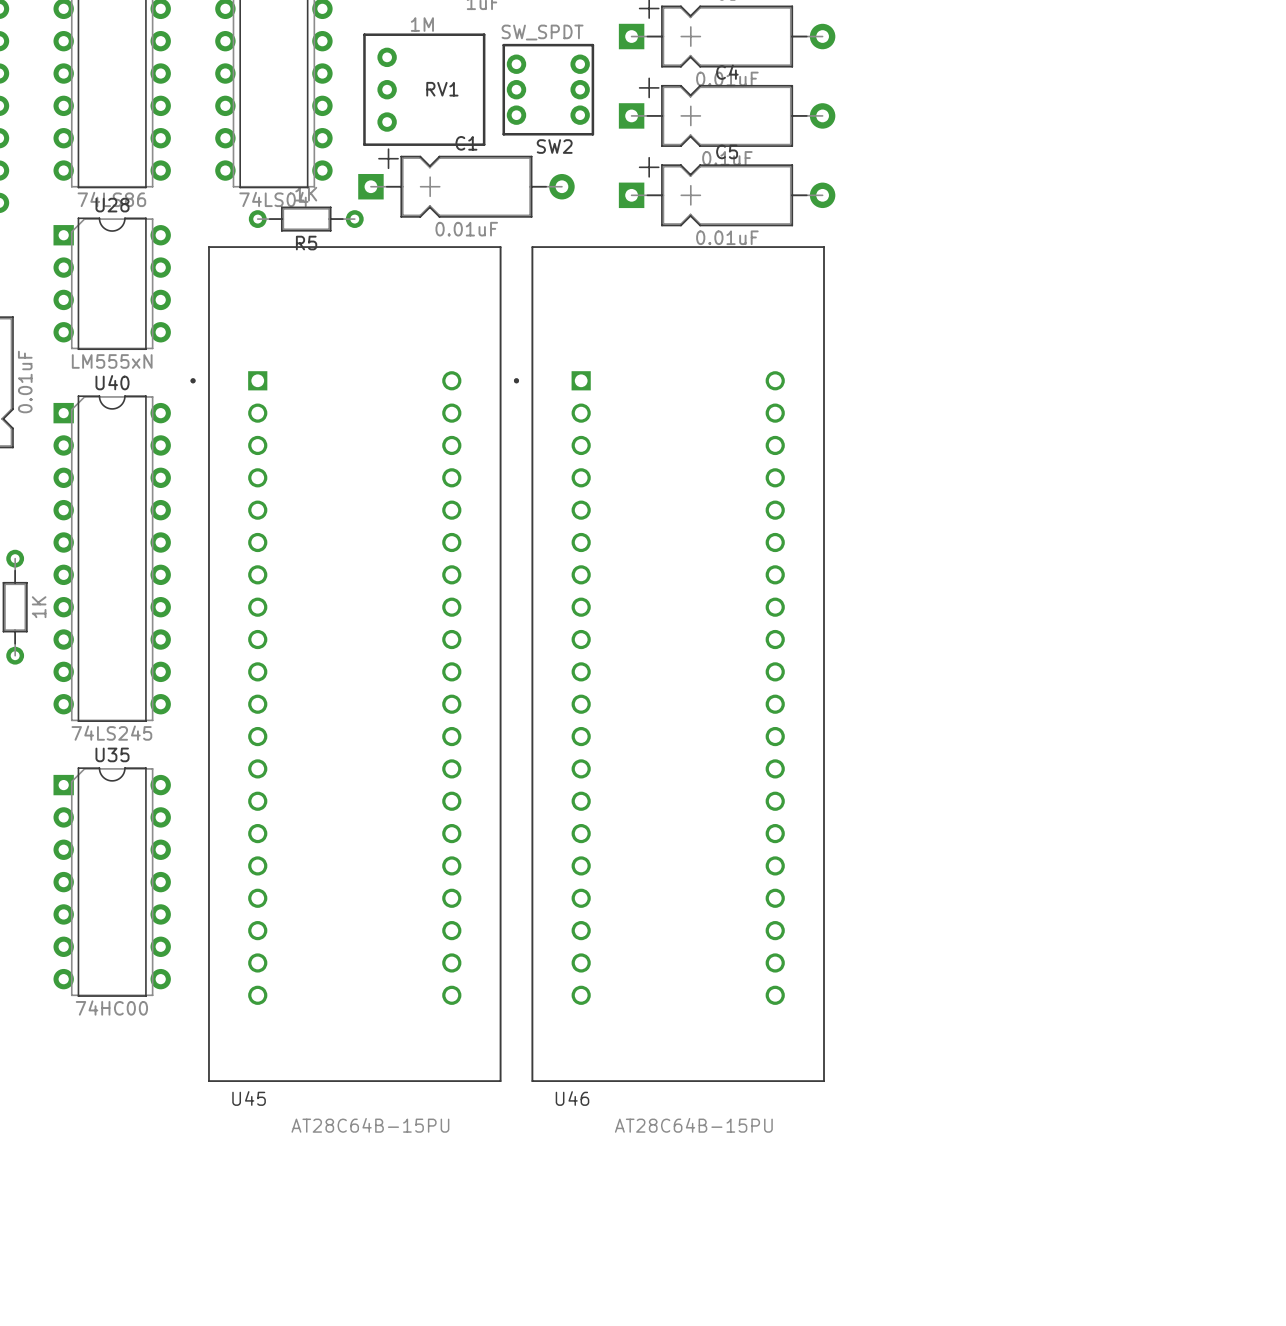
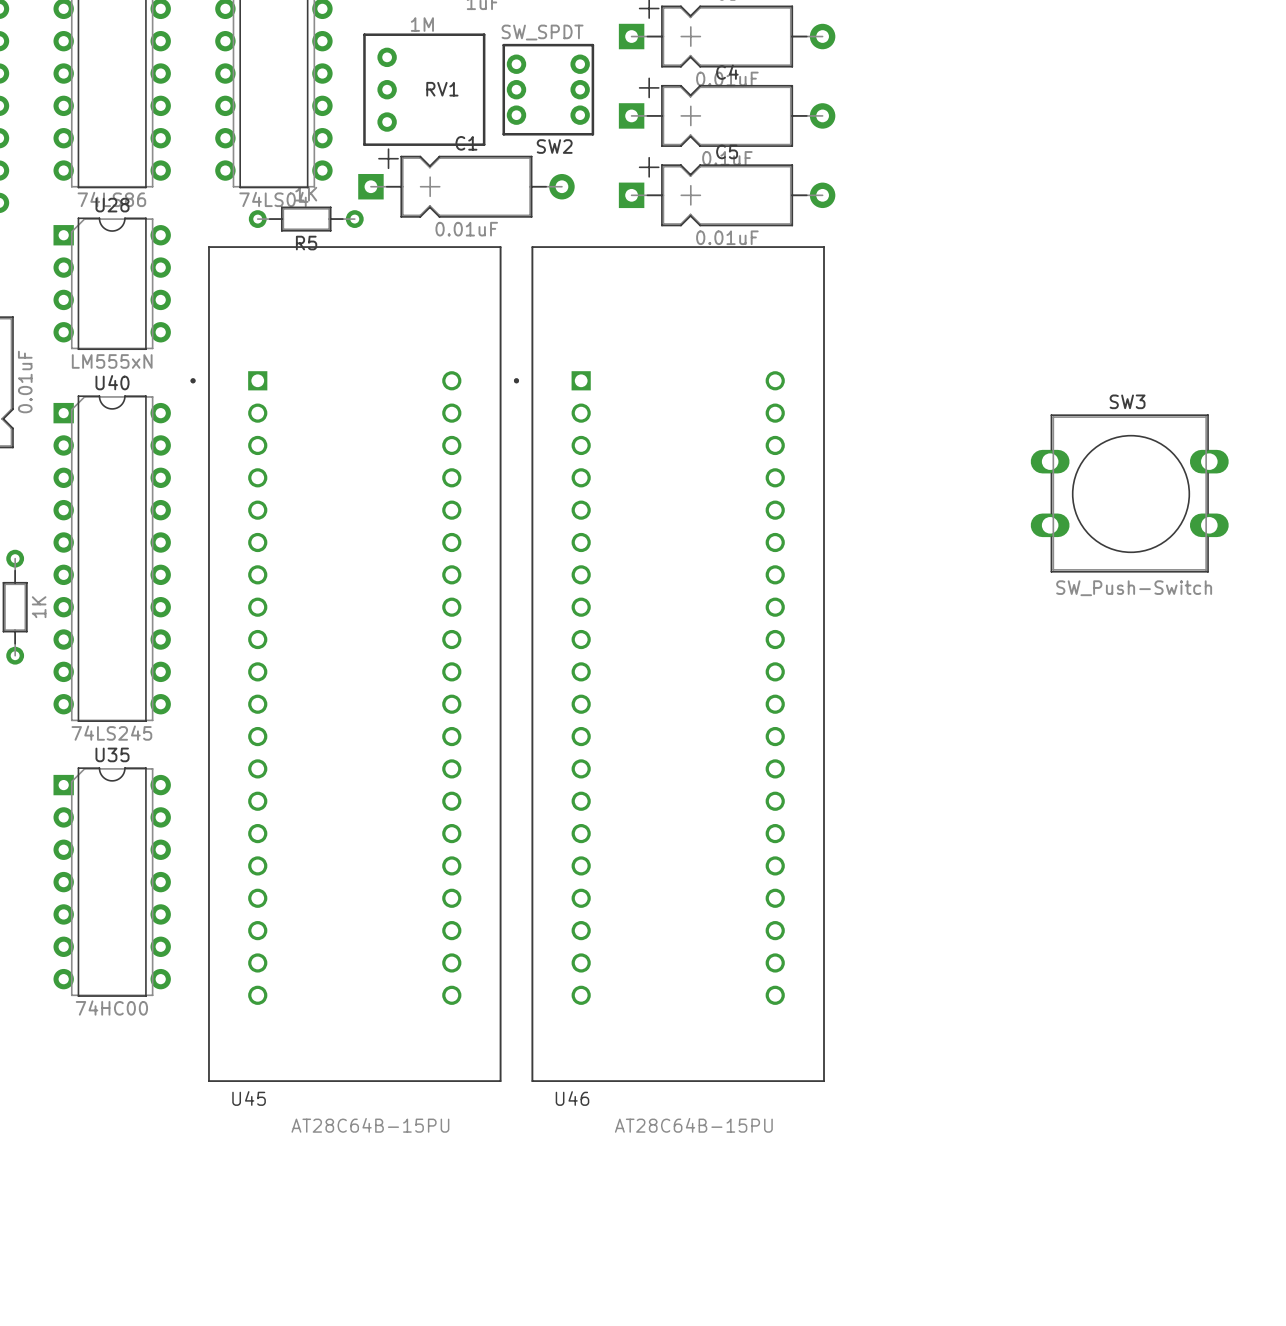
SW3: none -> SW_Push-Switch (1129, 493)

